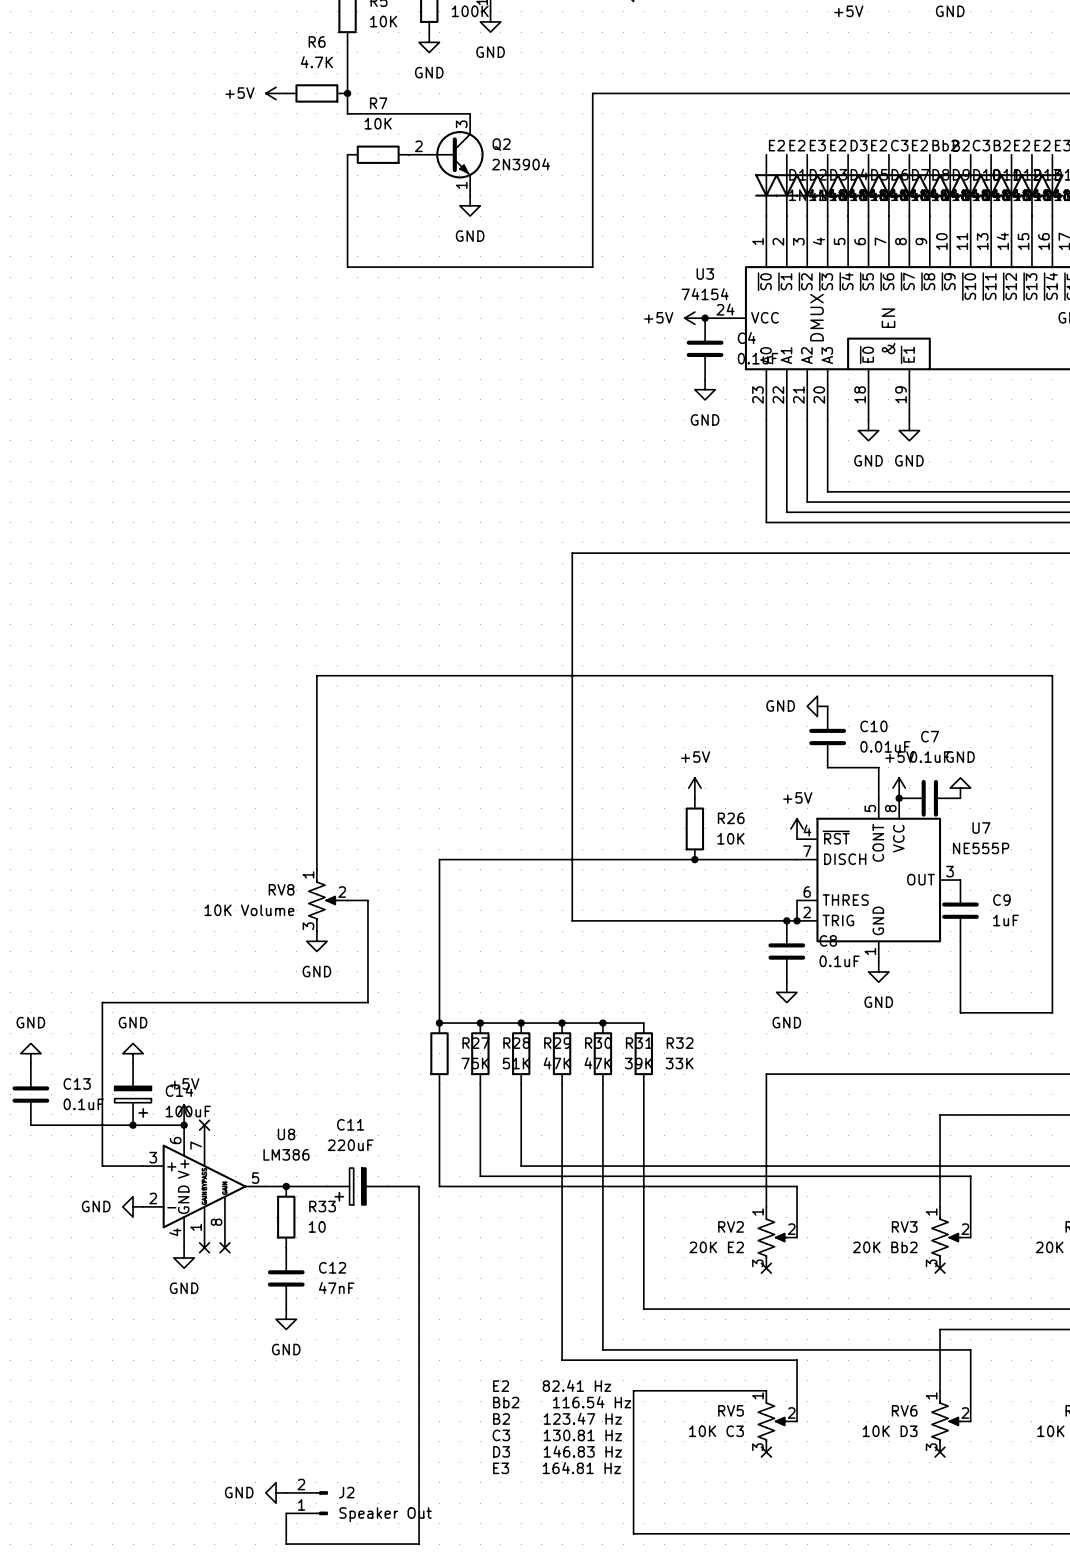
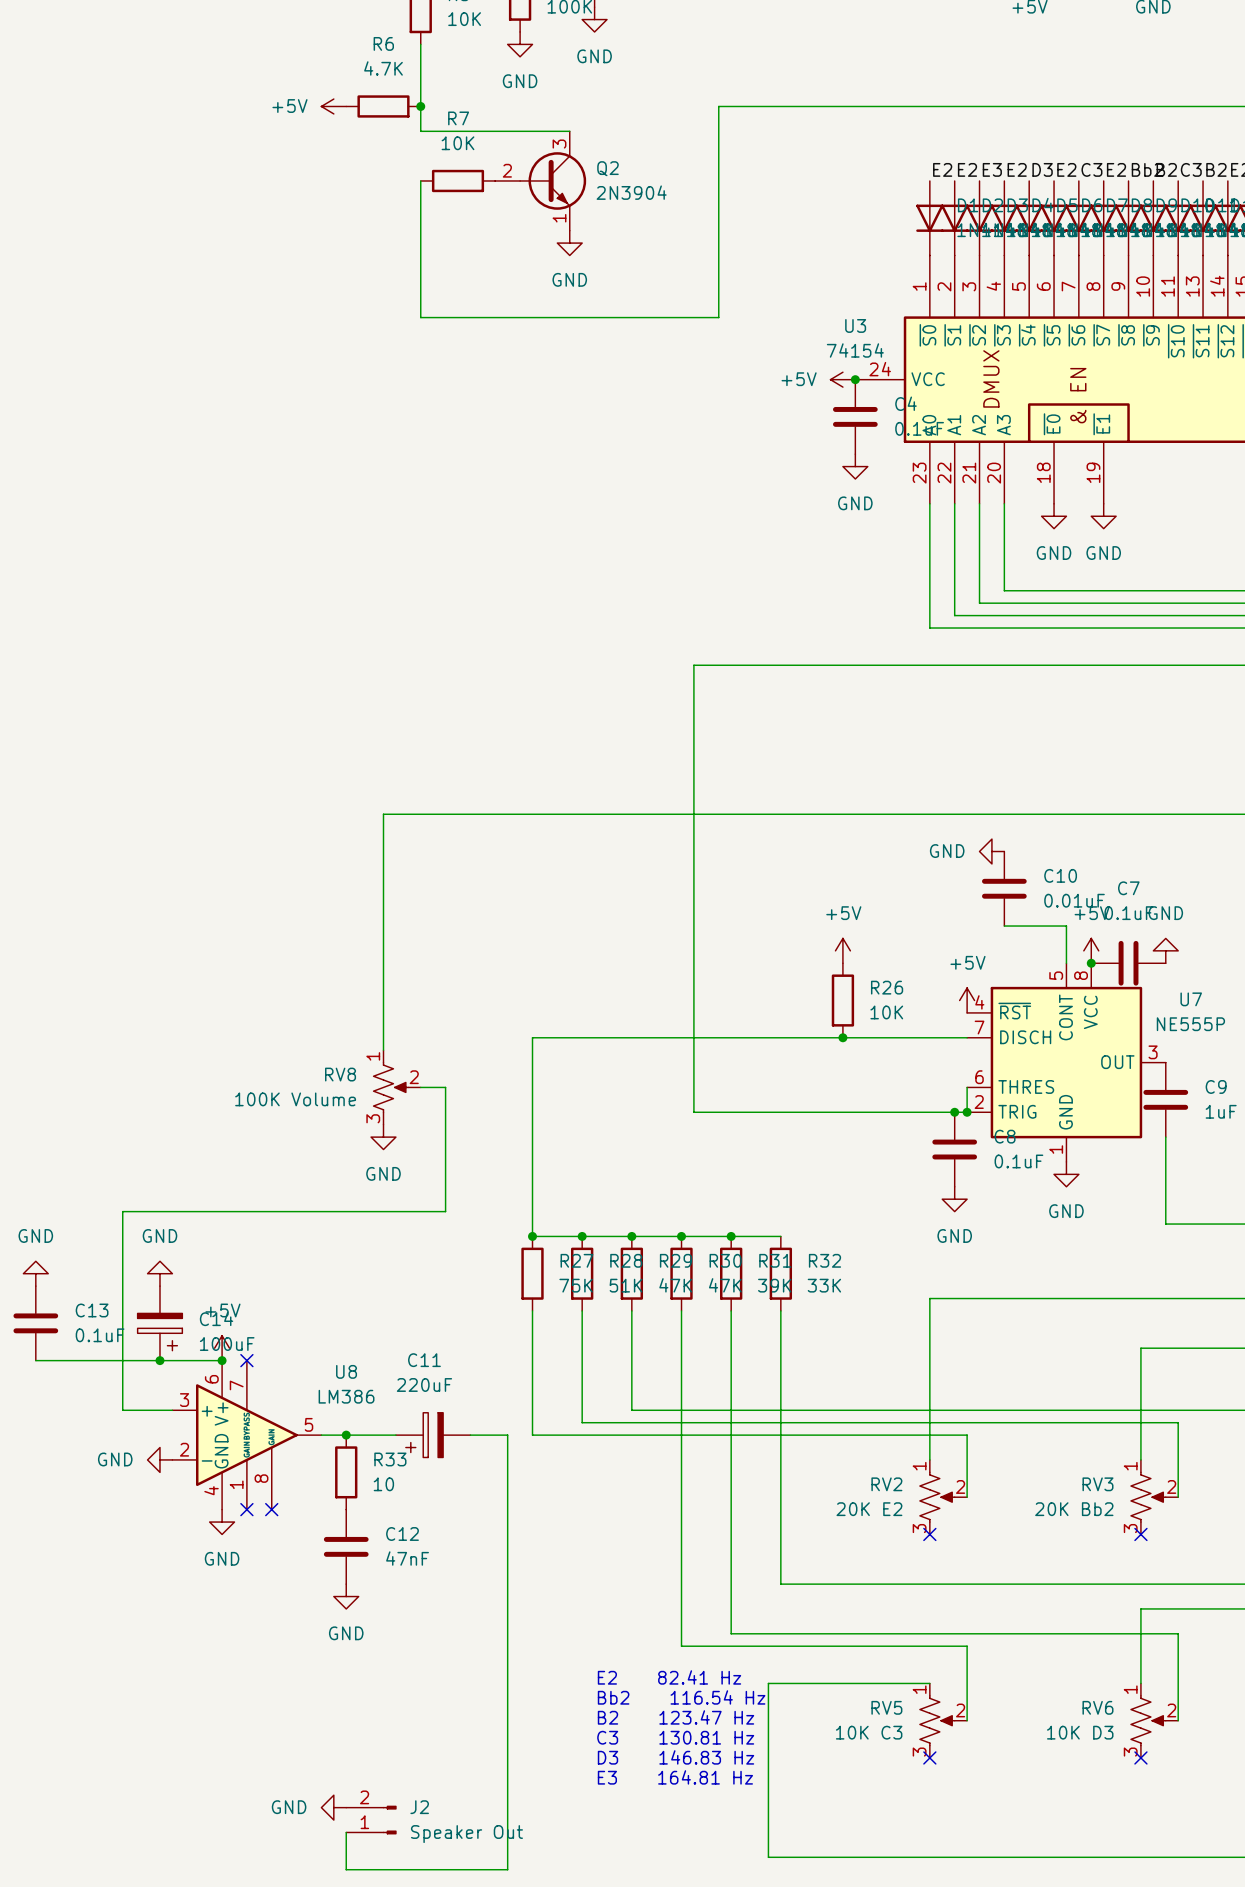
RV8 value: 10K Volume (249, 910) -> 100K Volume (295, 1099)

